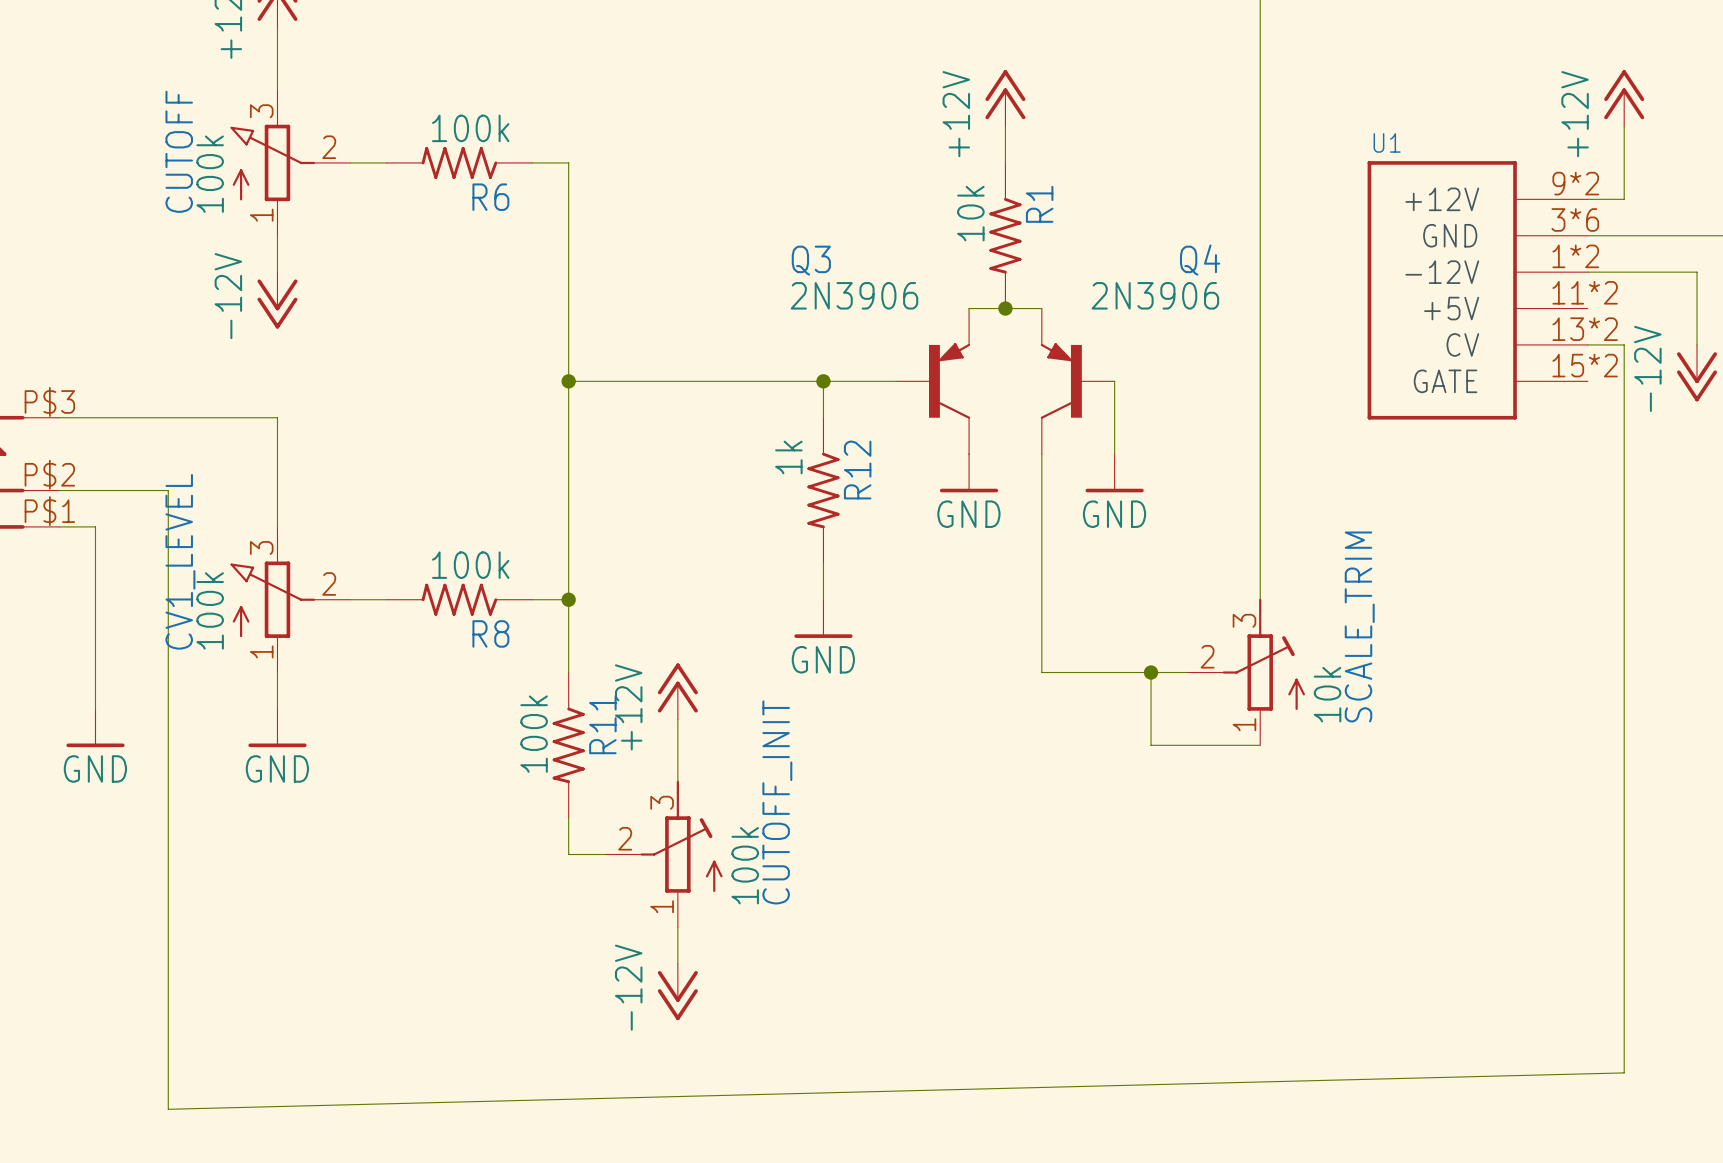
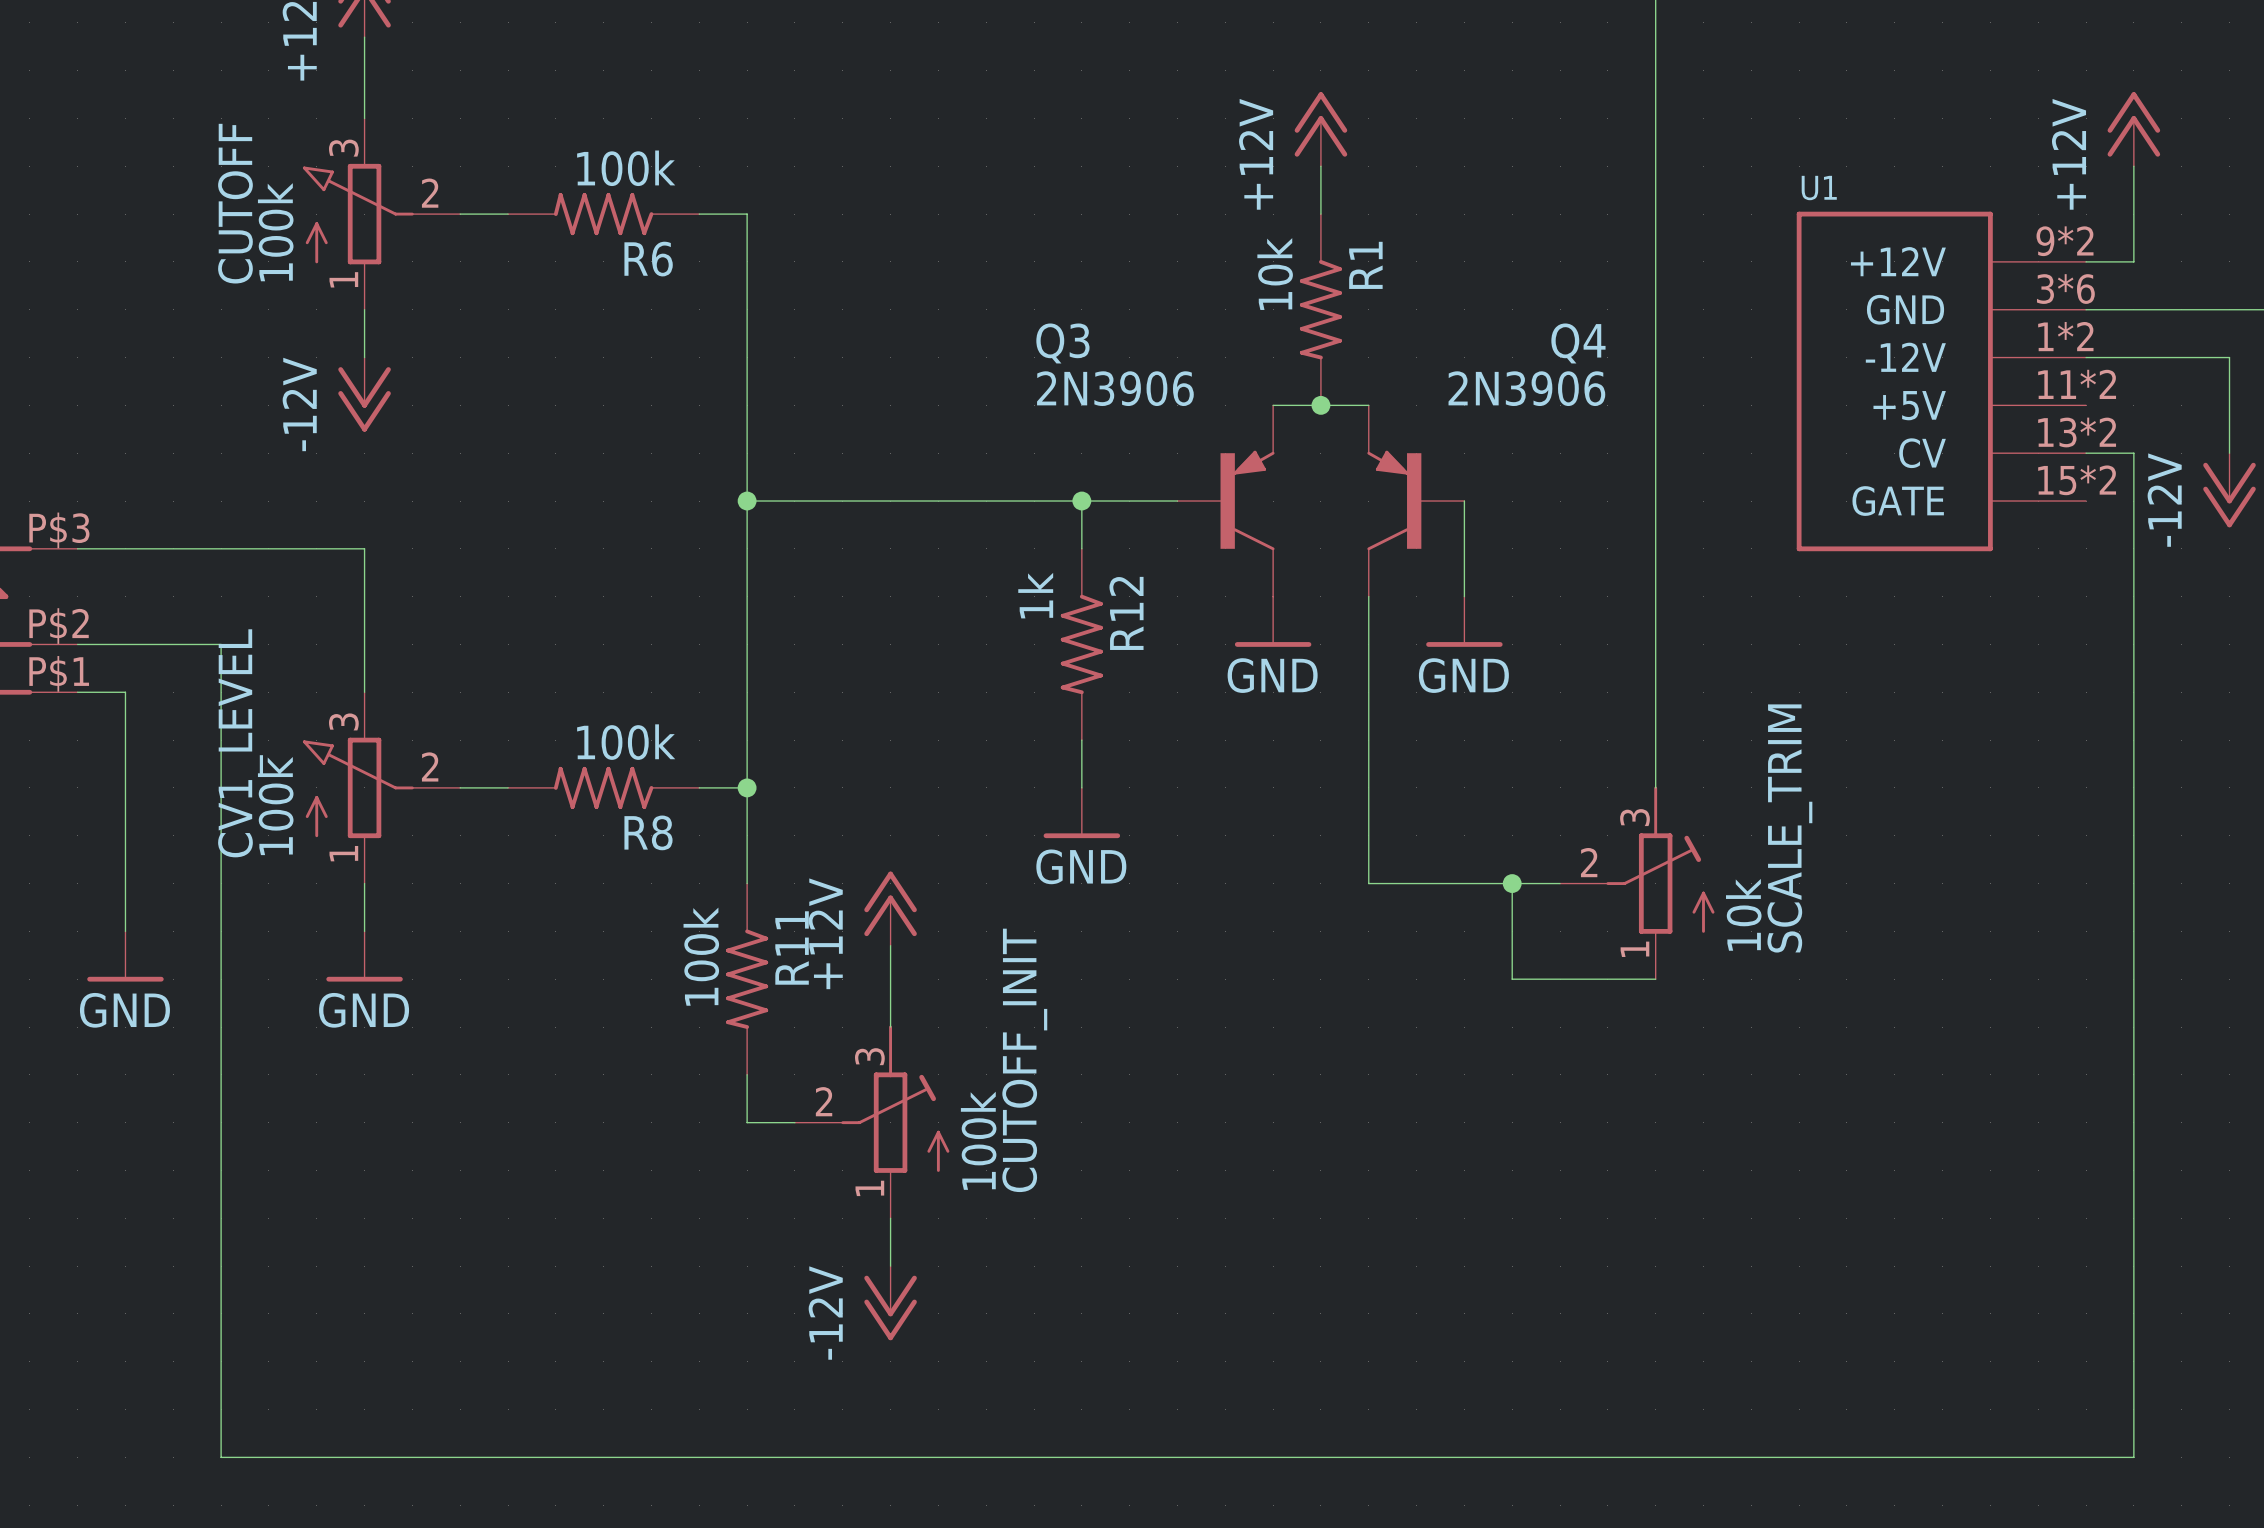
wire: (1624, 1072) (168, 1109) -> (2133, 1409) (2133, 1457) (221, 1457)

